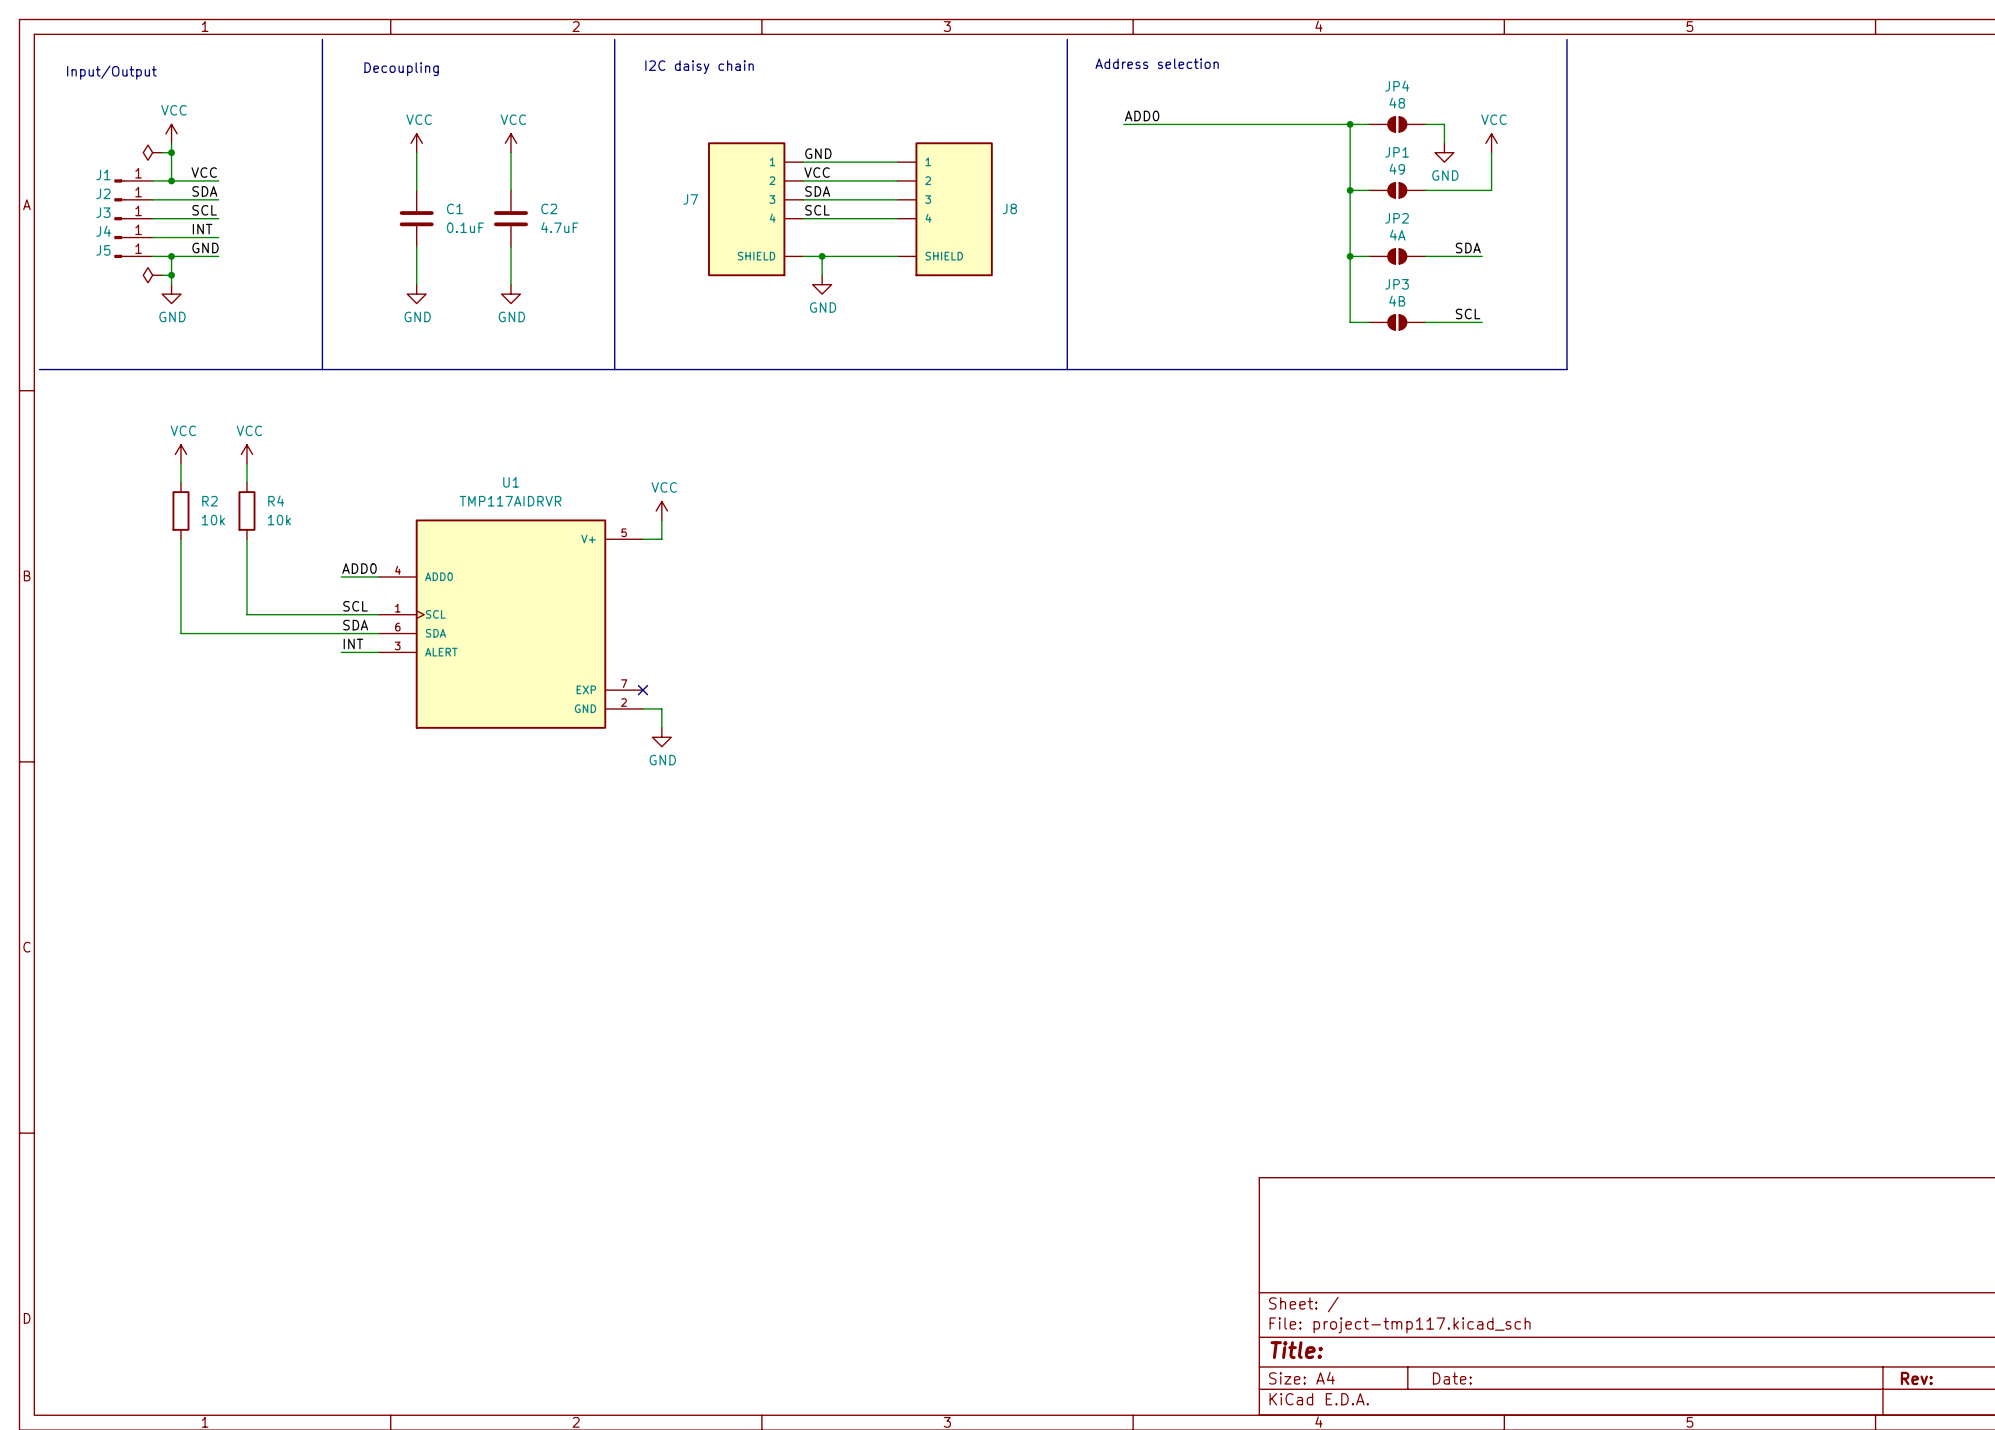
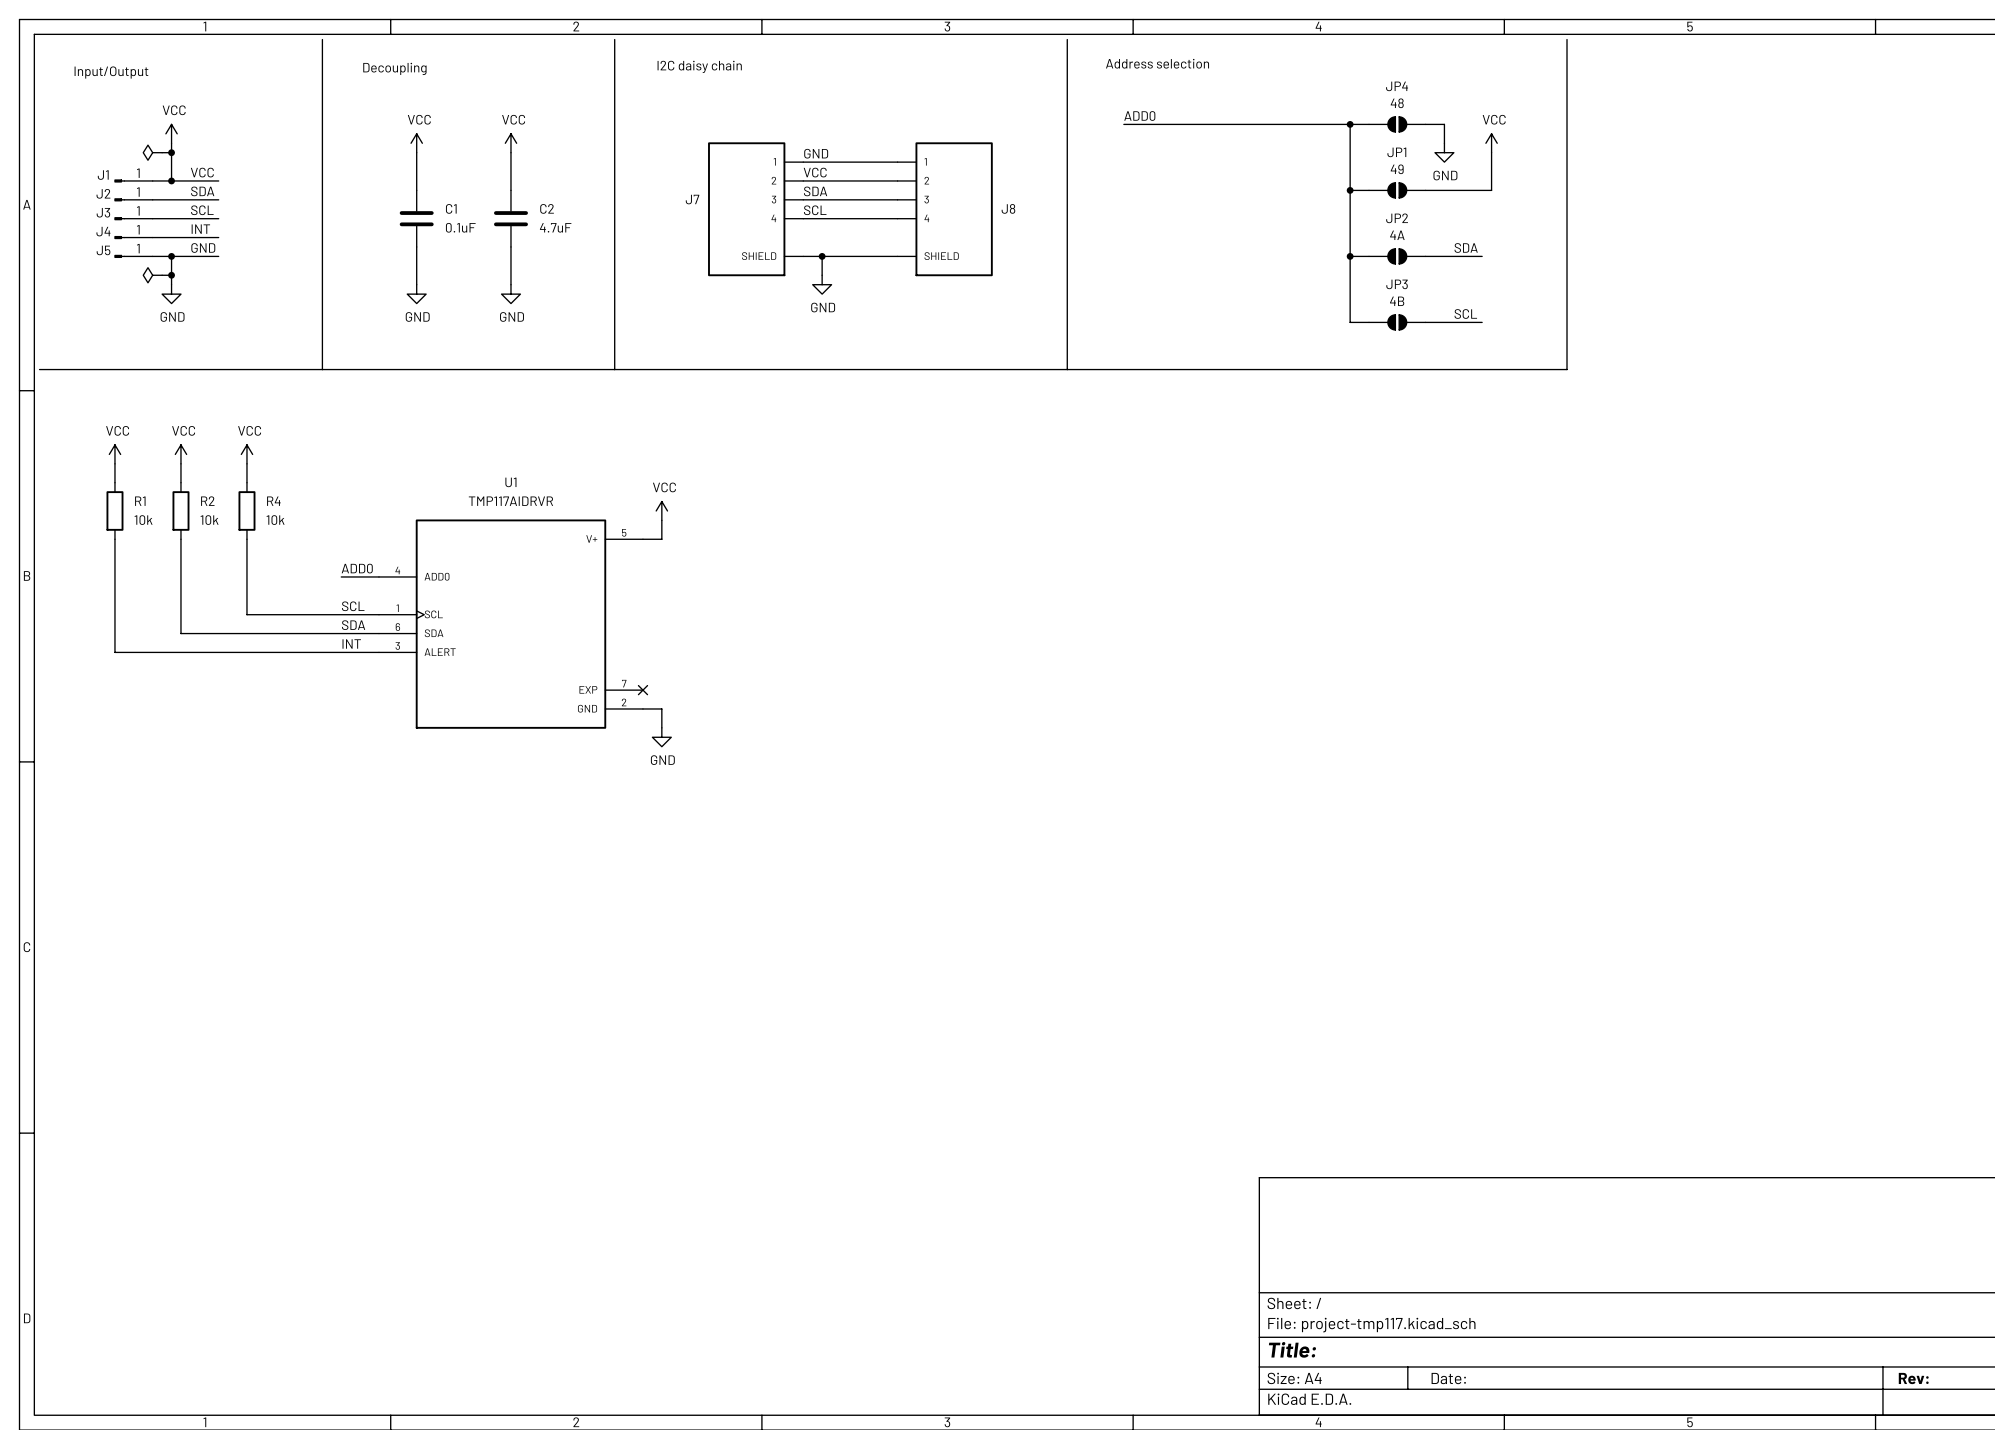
power symbol: none -> VCC (114, 454)
wire: none -> (114, 463) (114, 482)
R1: none -> 10k (114, 510)
wire: none -> (114, 539) (114, 652) (341, 652)

